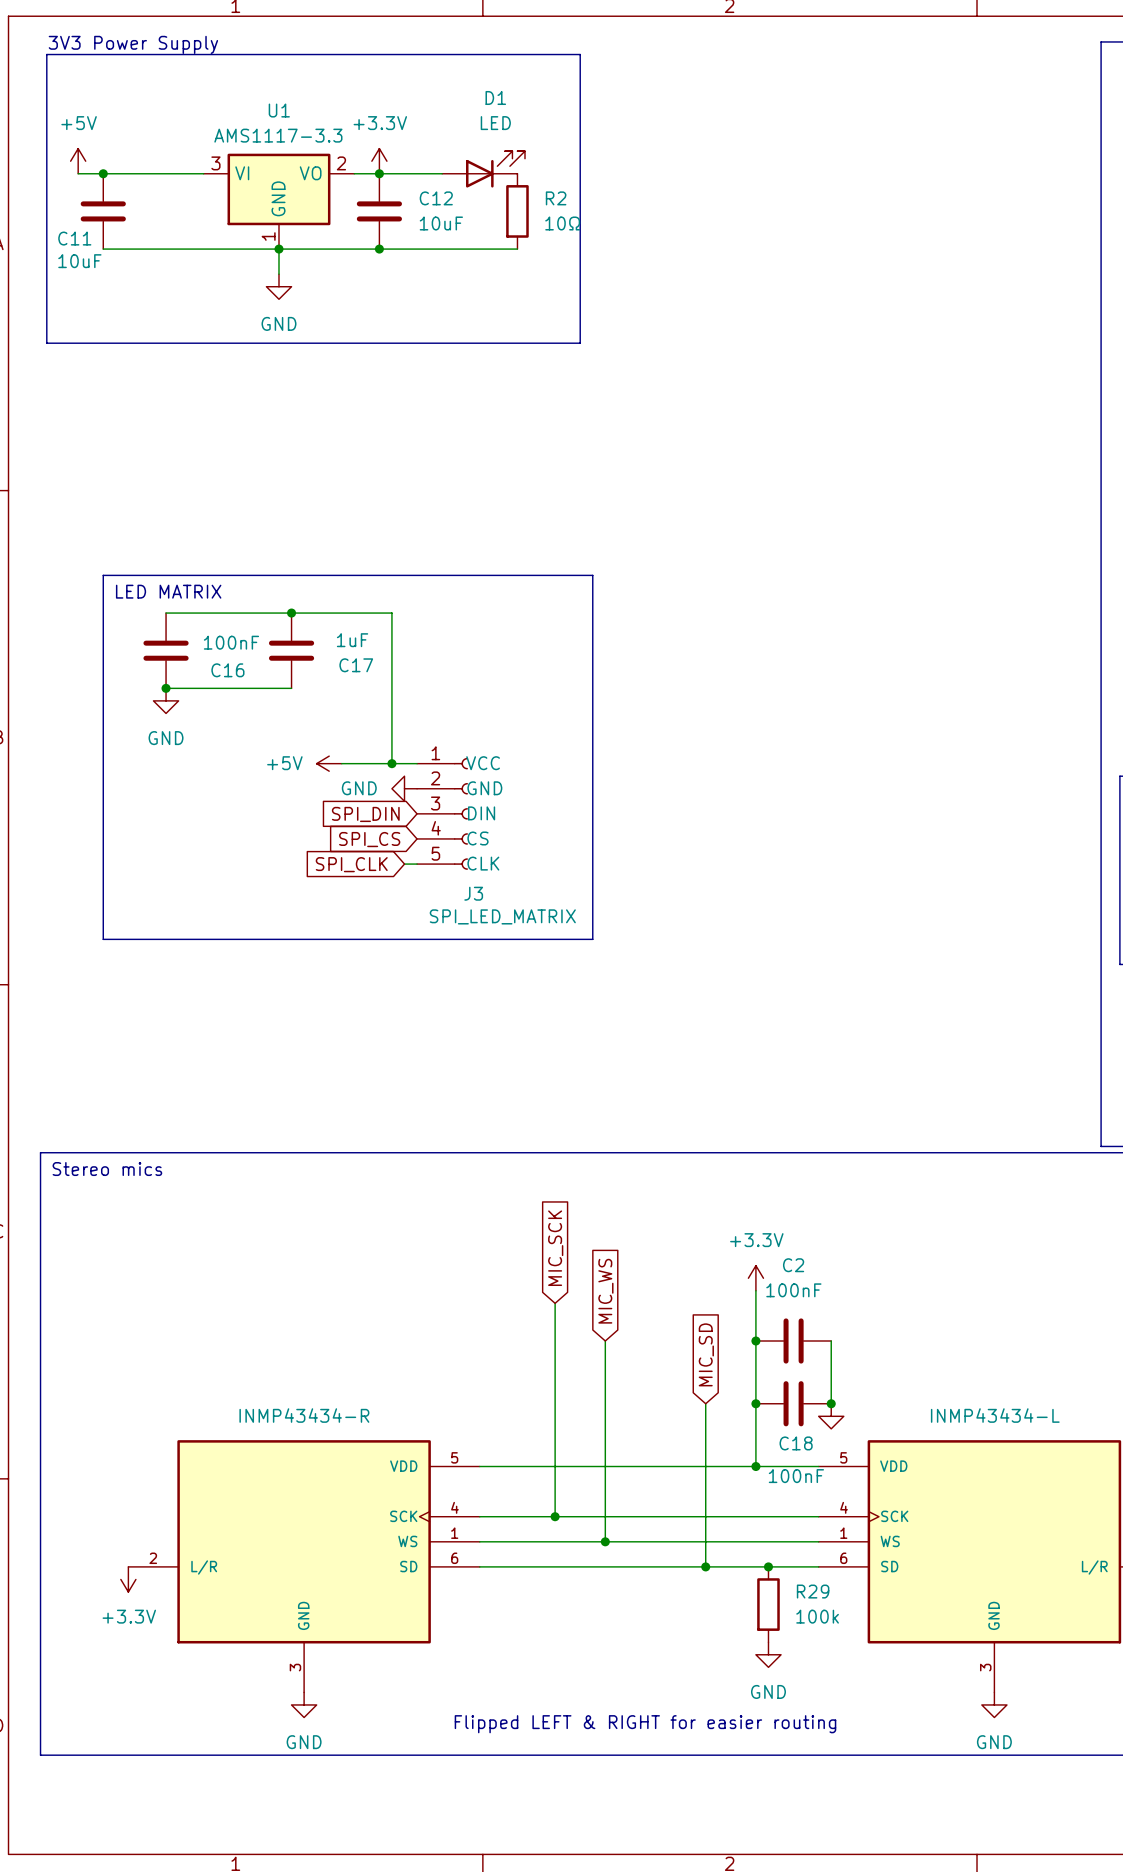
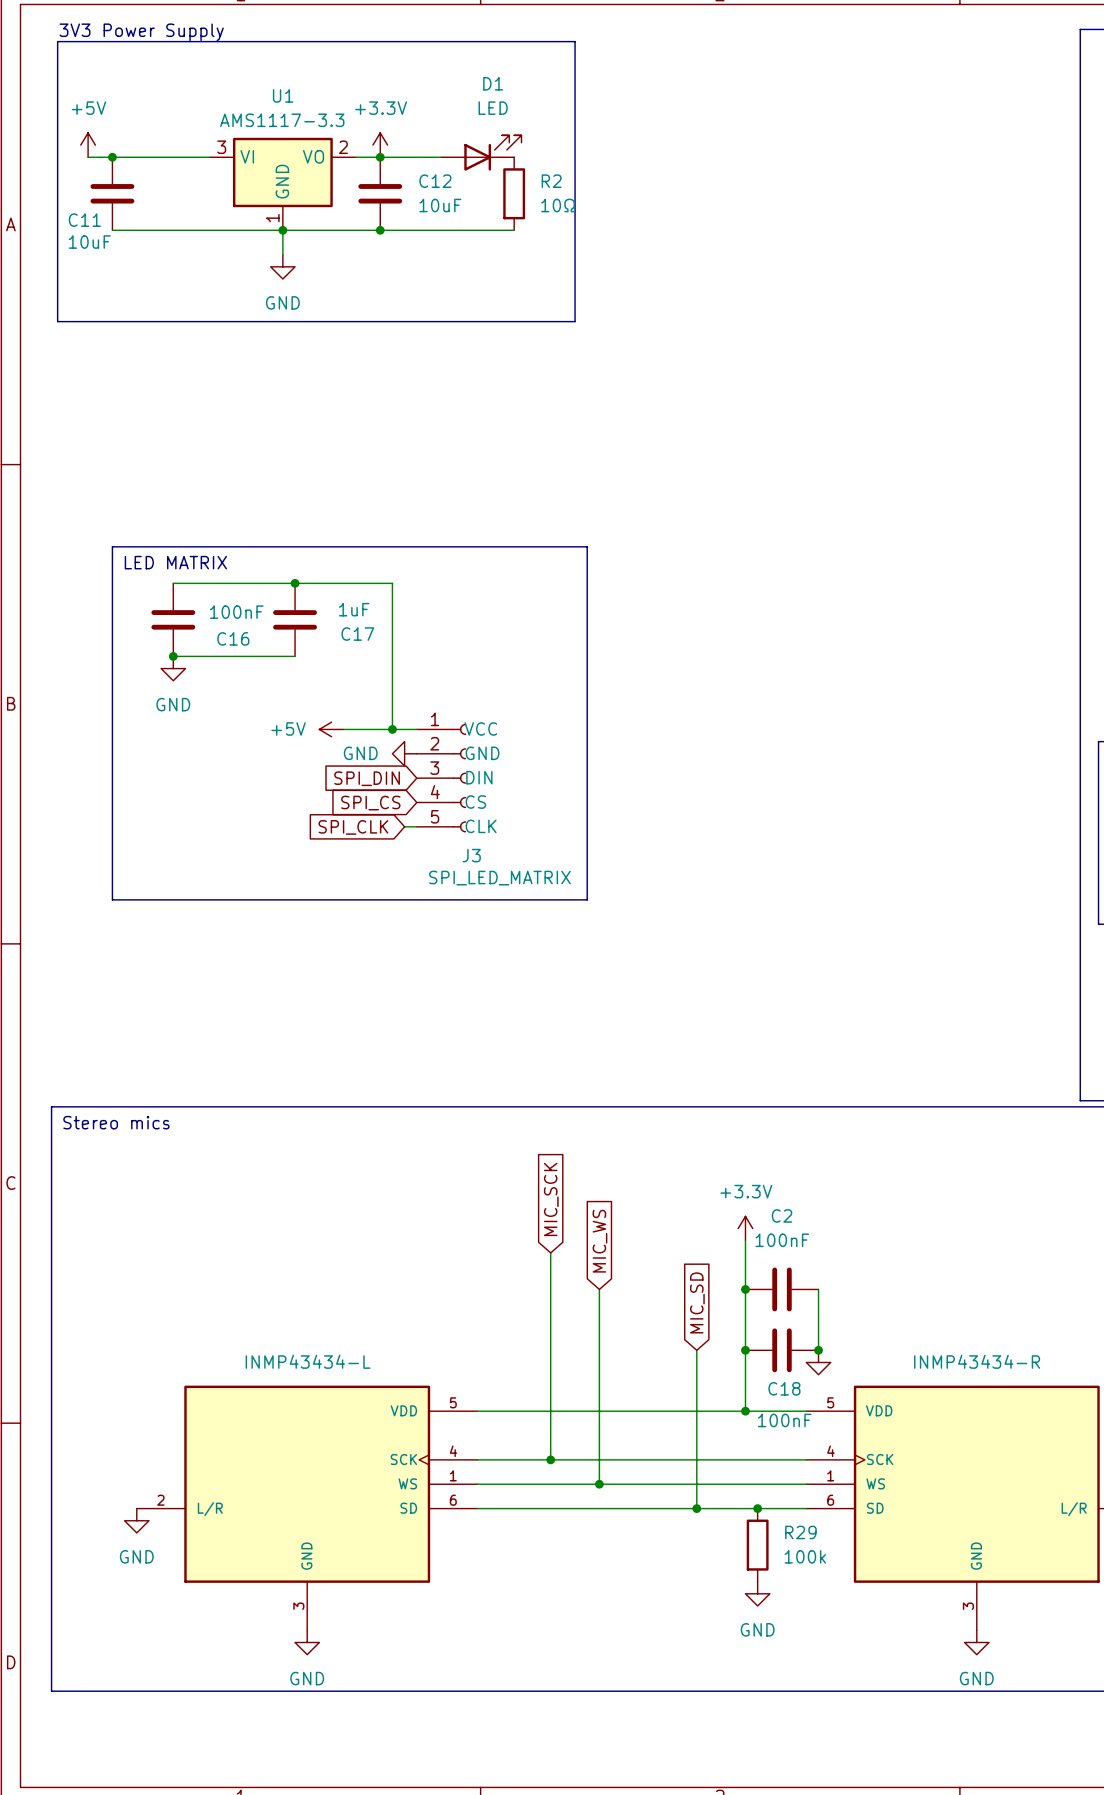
part value: INMP43434-R (304, 1415) -> INMP43434-L (308, 1361)
part value: INMP43434-L (995, 1415) -> INMP43434-R (977, 1361)
power symbol: +3.3V (128, 1579) -> GND (136, 1520)
text: Flipped LEFT & RIGHT for easier routing (645, 1724) -> none

